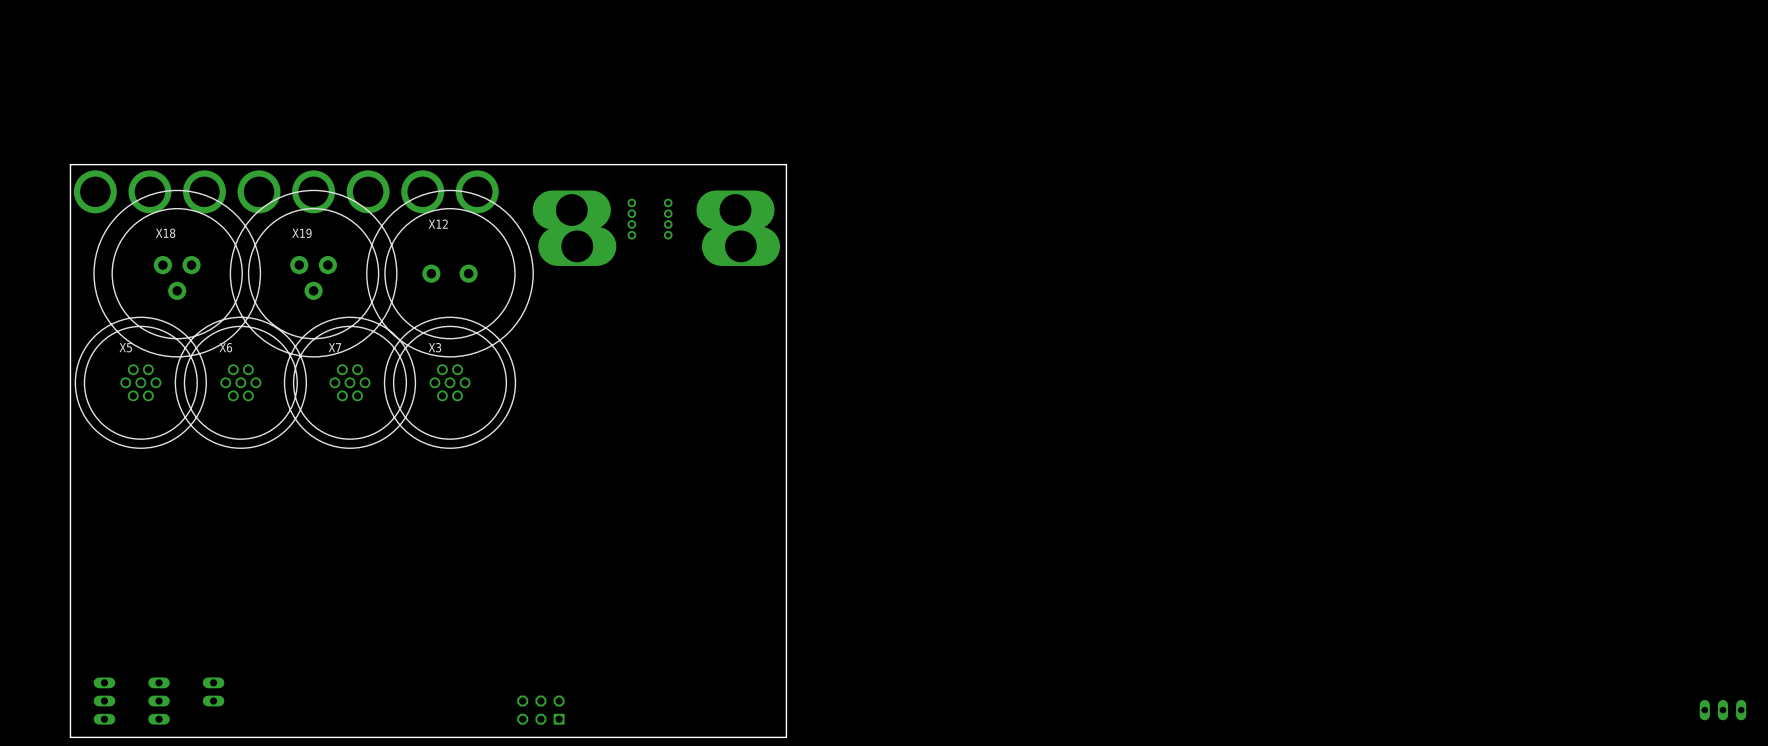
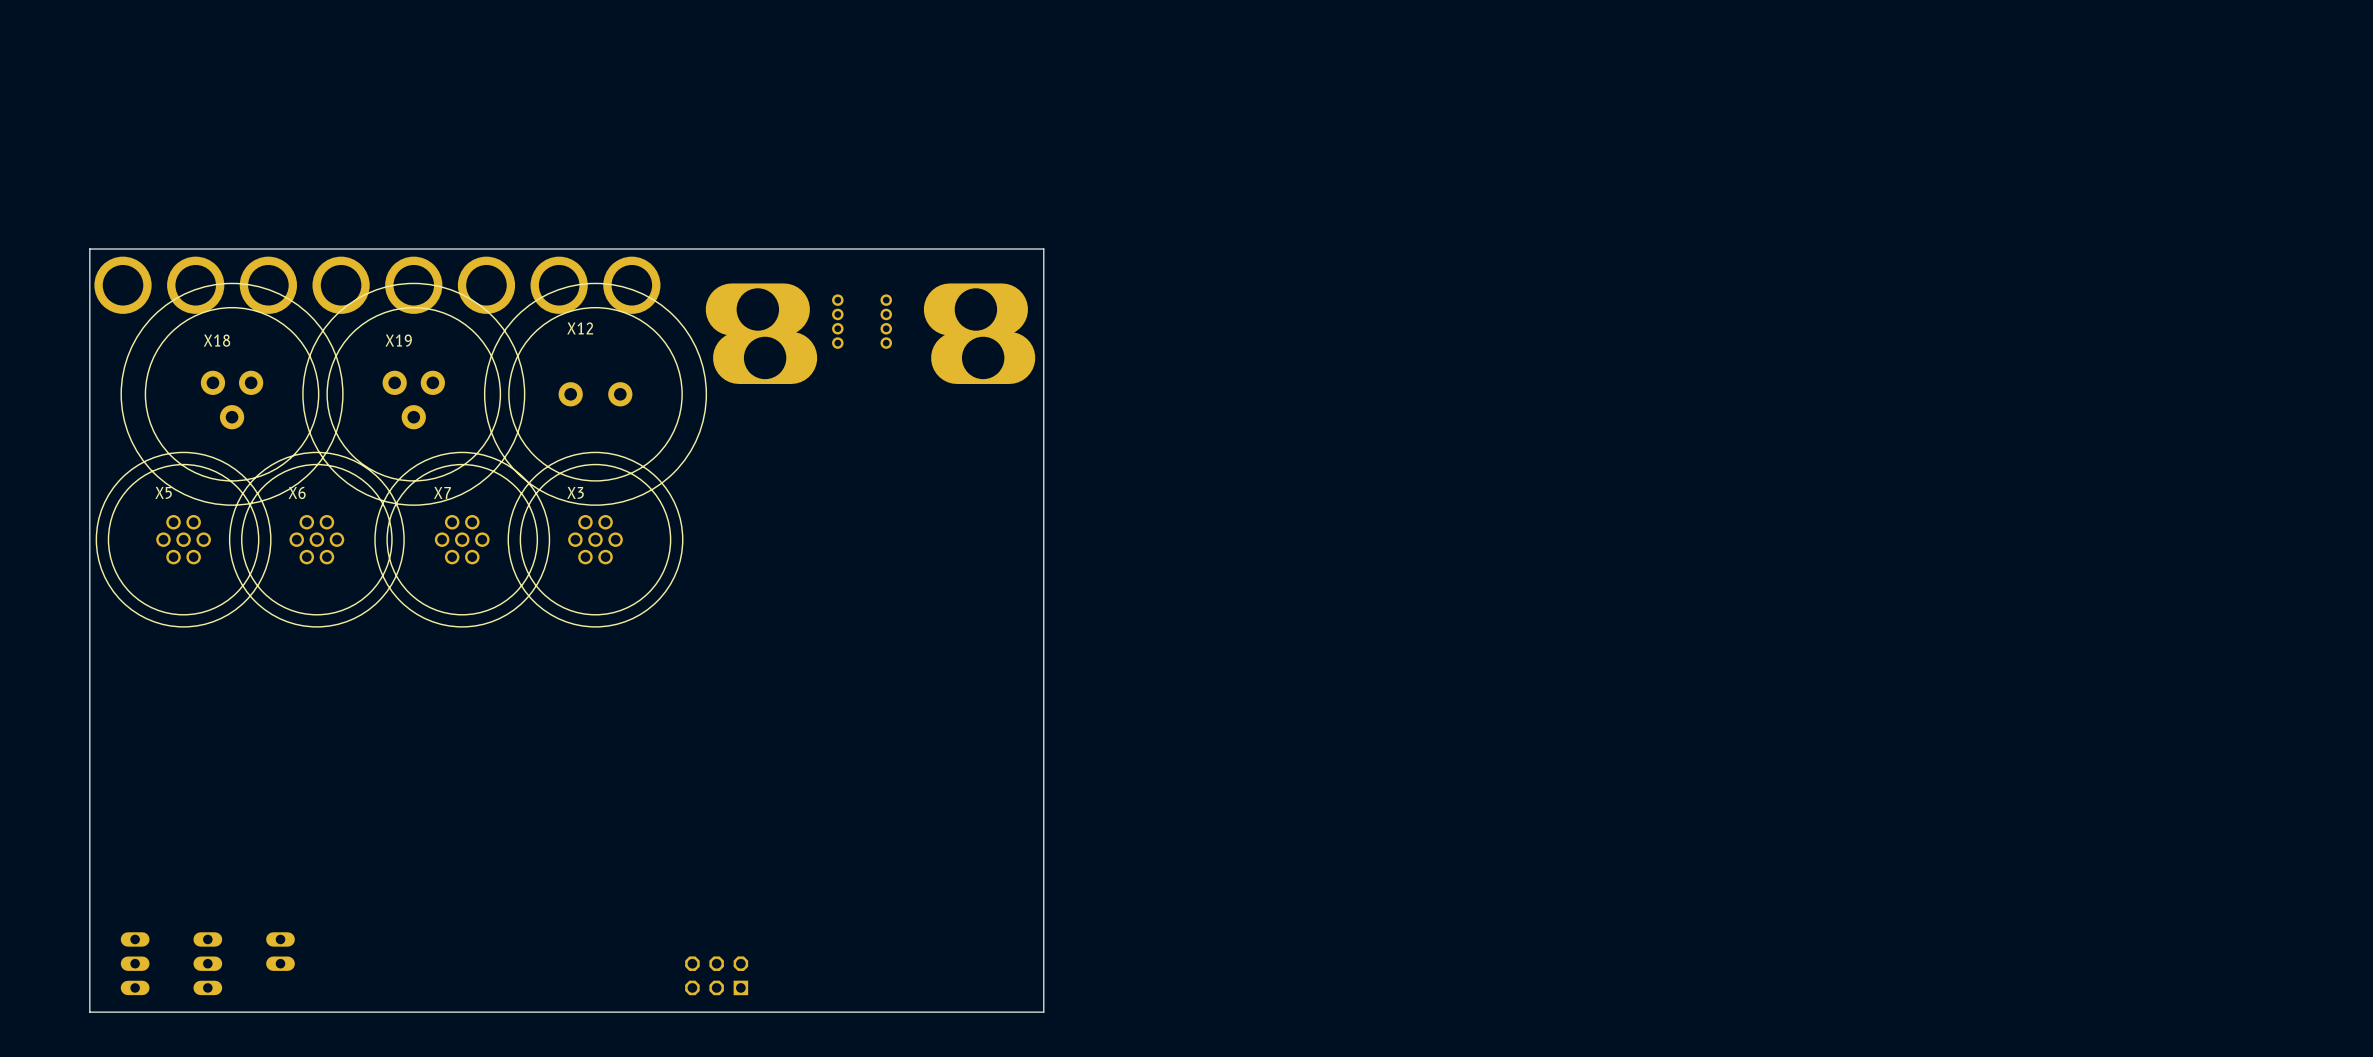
part: (1722, 710) -> none

